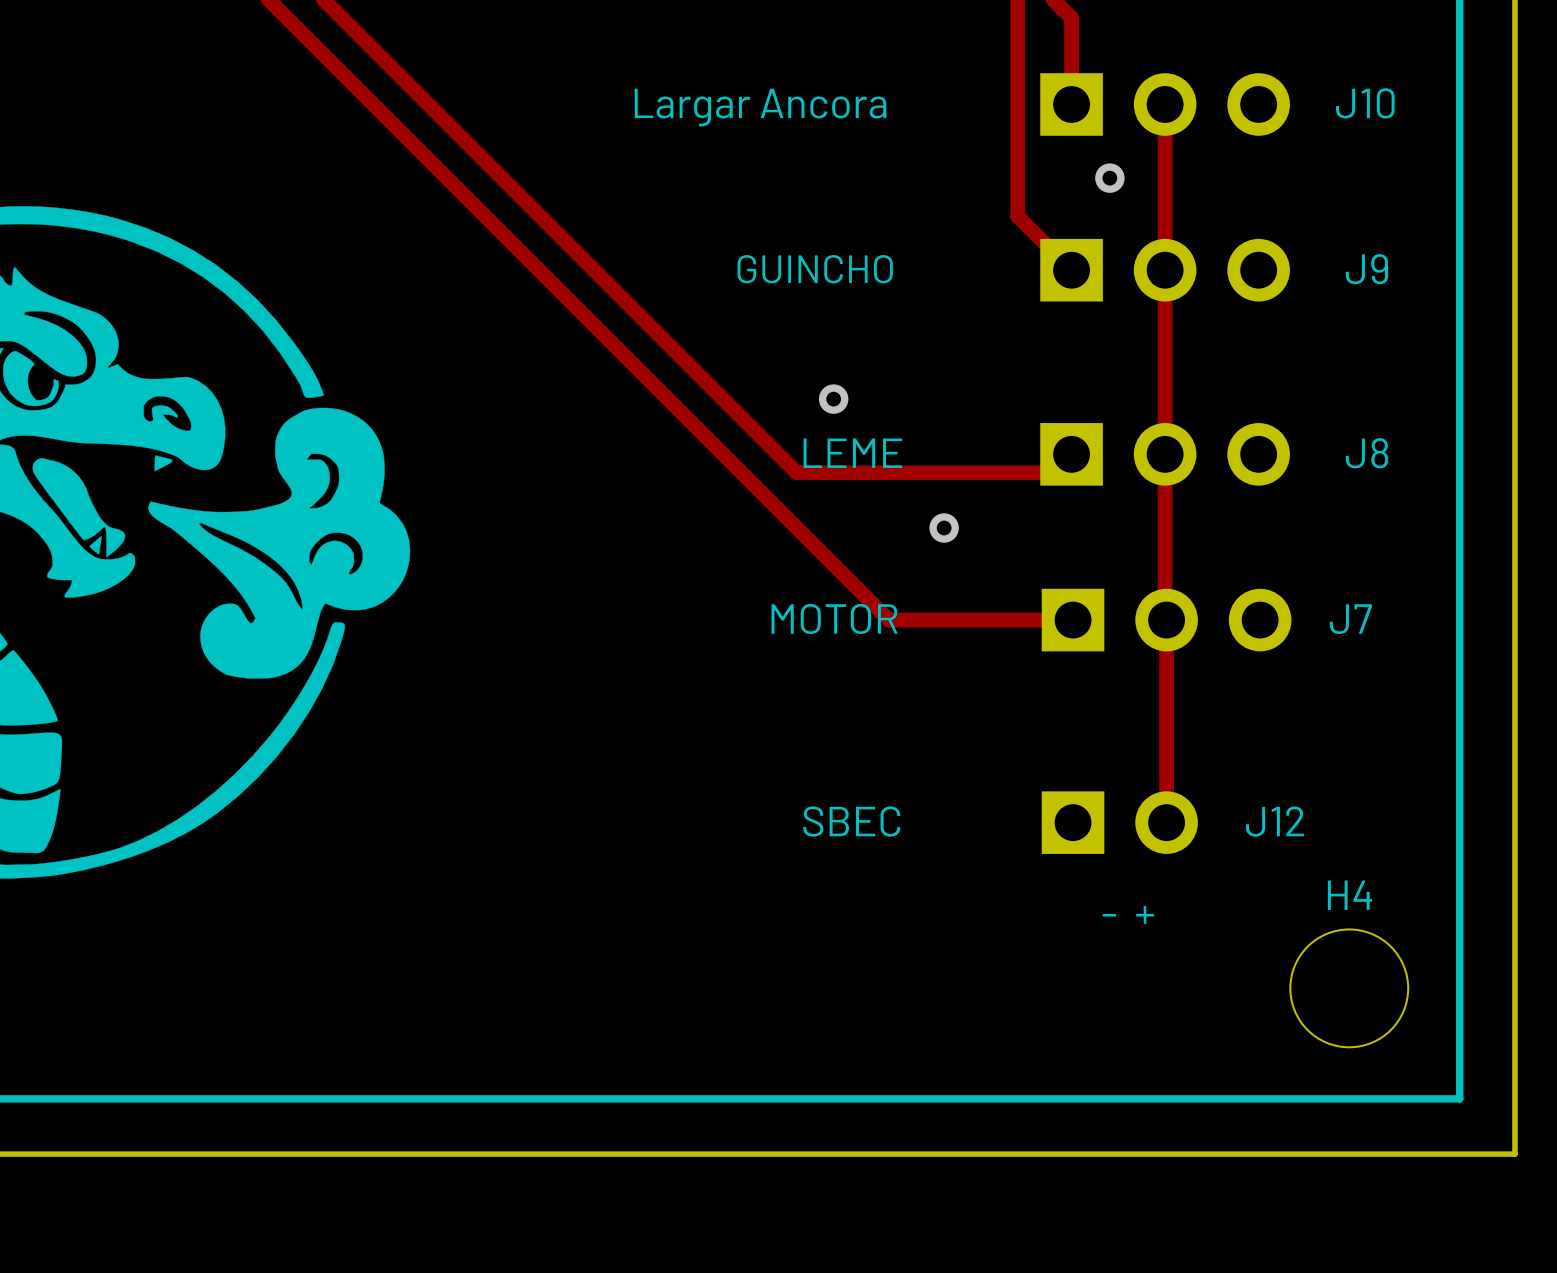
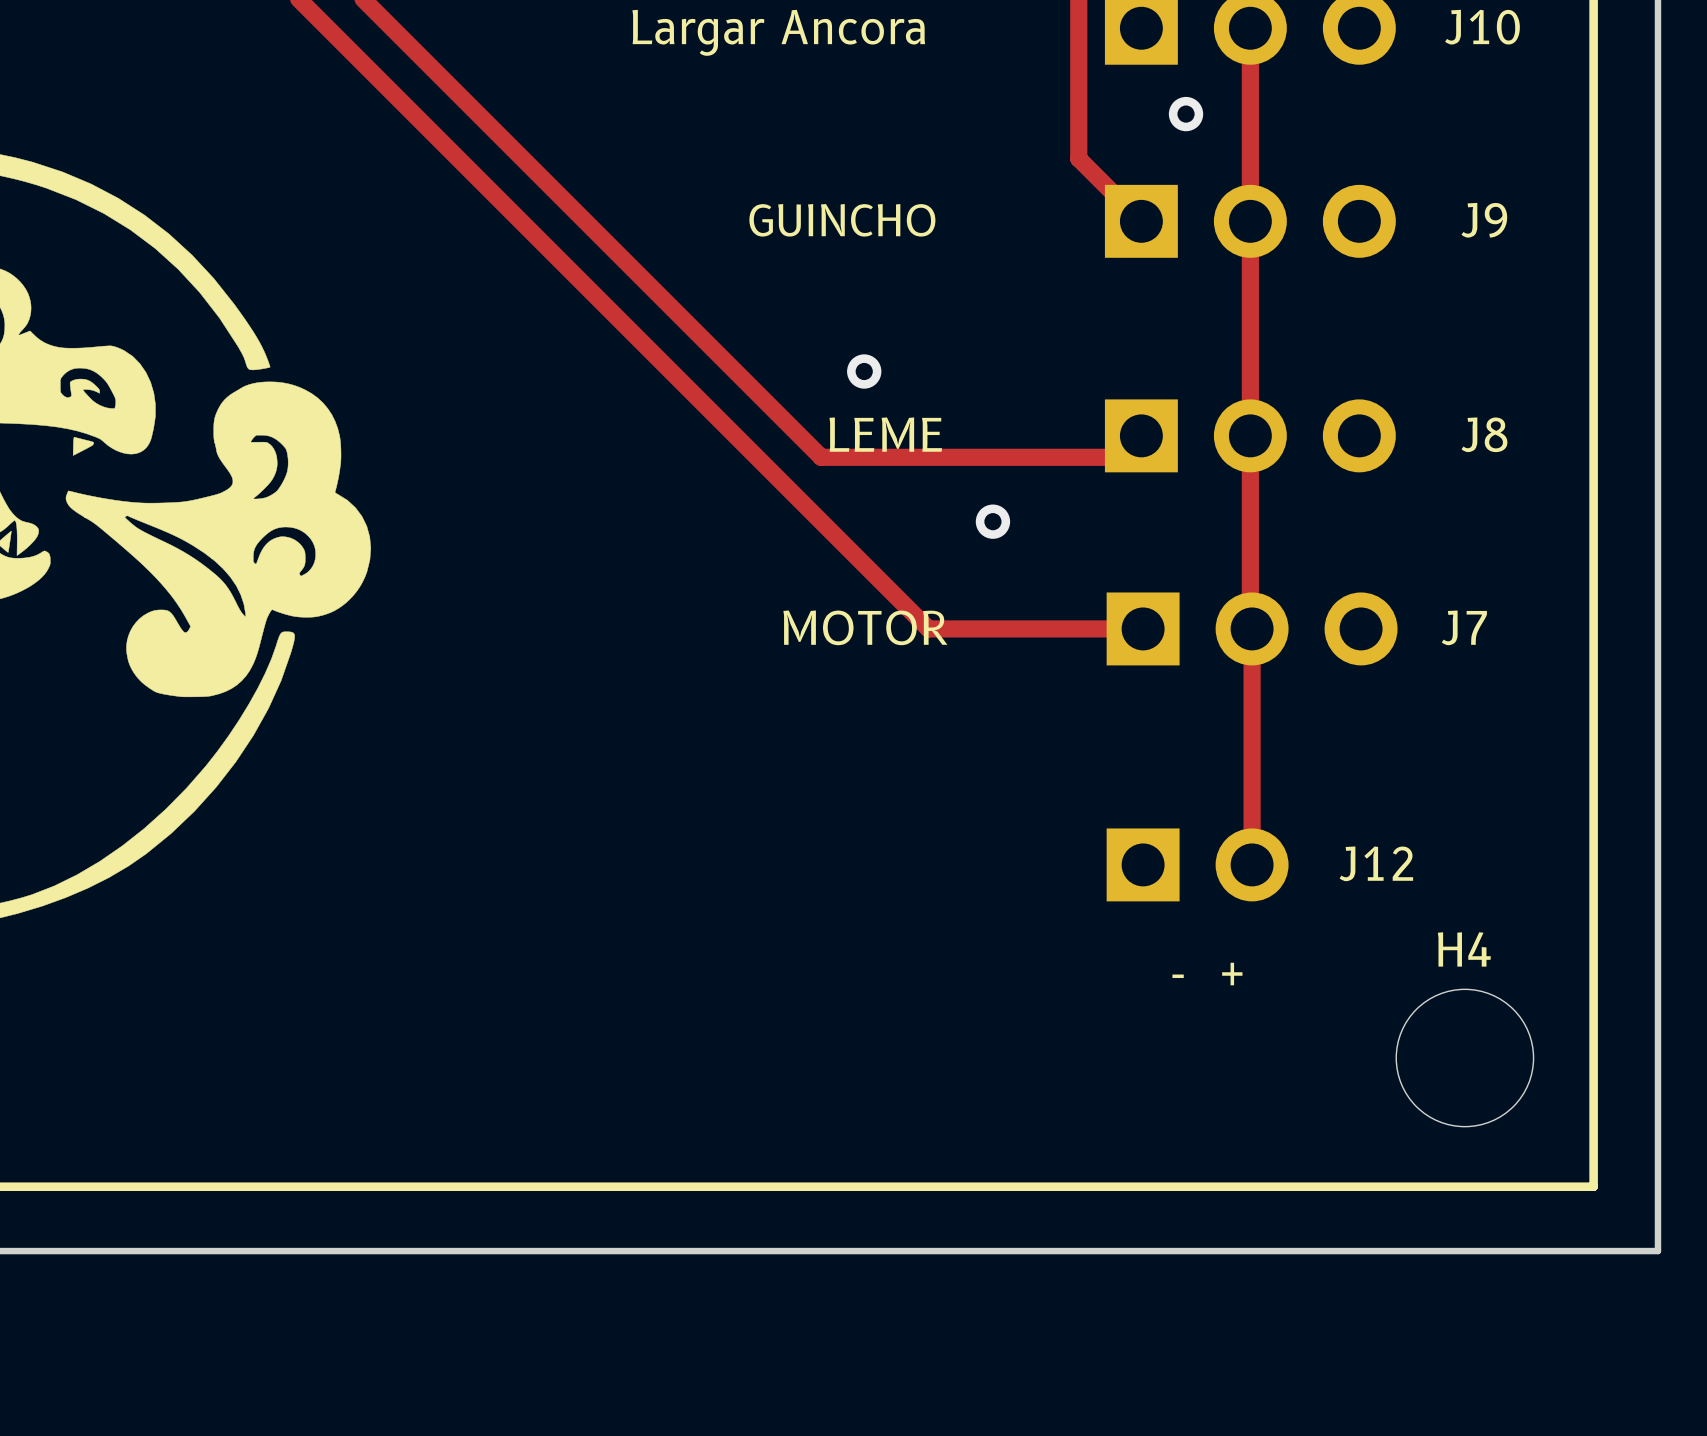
text: SBEC (851, 821) -> none

